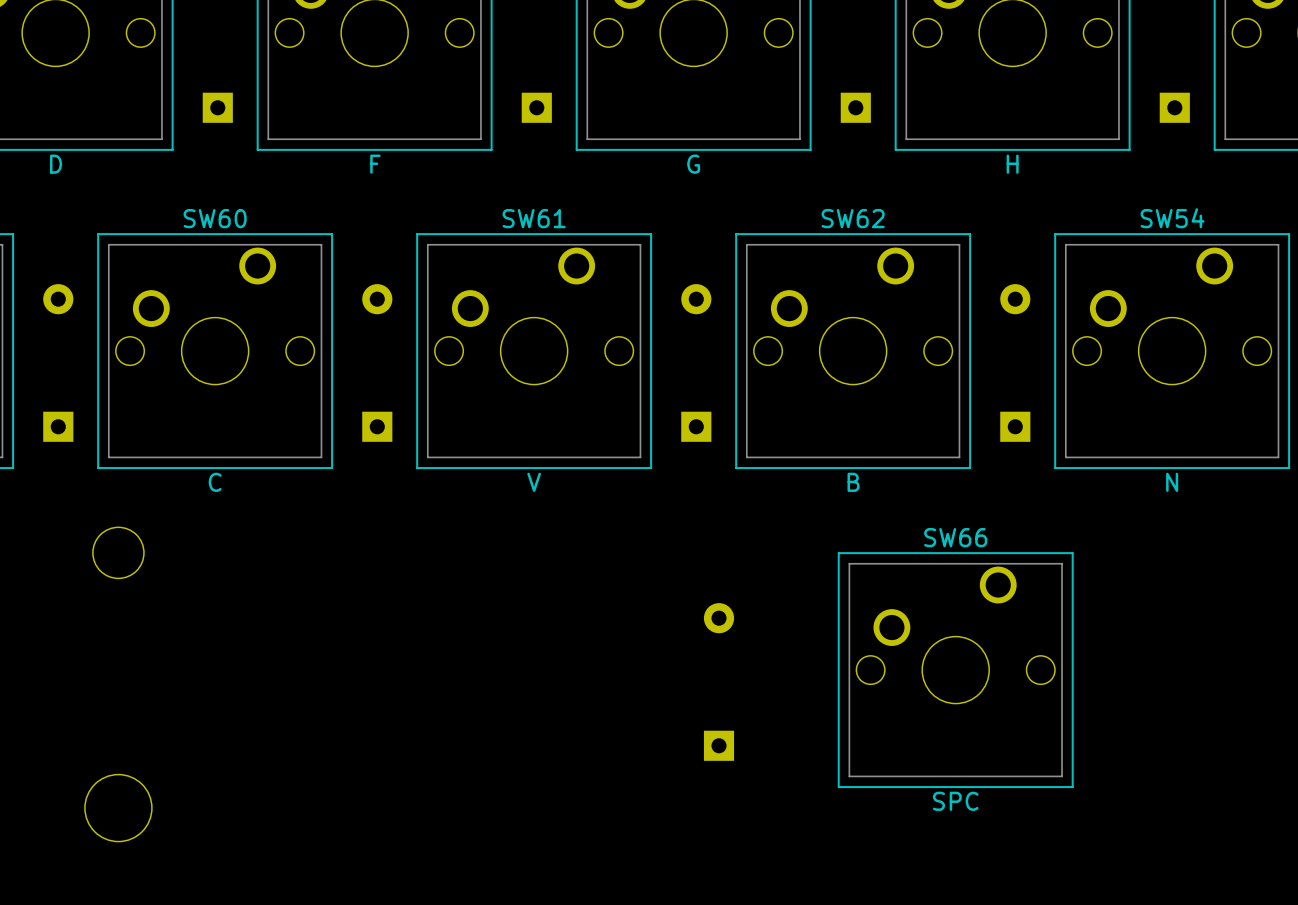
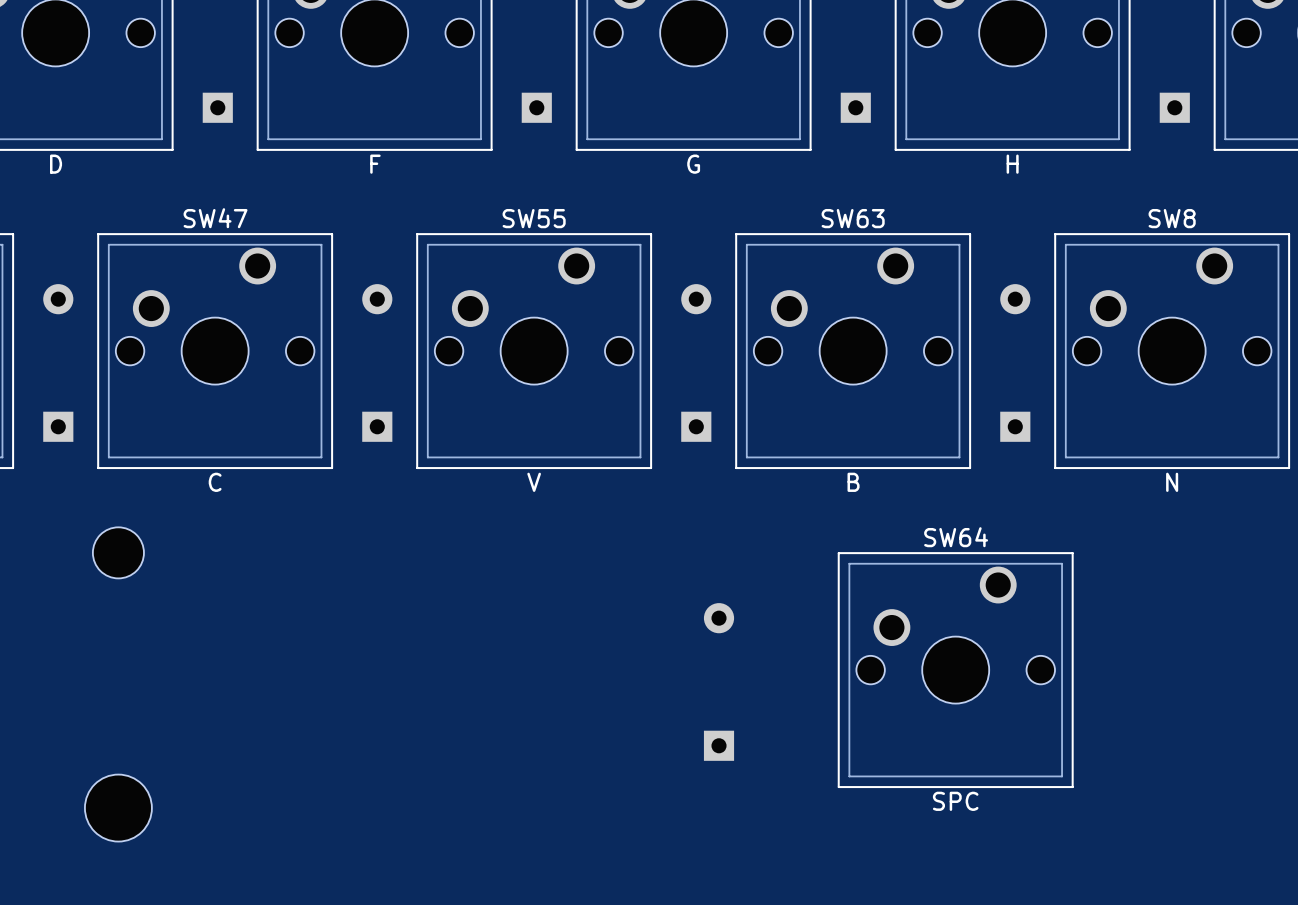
SW60 name: SW60 (215, 218) -> SW47 (215, 218)
SW61 name: SW61 (534, 218) -> SW55 (534, 218)
SW62 name: SW62 (853, 218) -> SW63 (853, 218)
SW54 name: SW54 (1172, 218) -> SW8 (1172, 218)
SW66 name: SW66 (955, 537) -> SW64 (956, 537)

